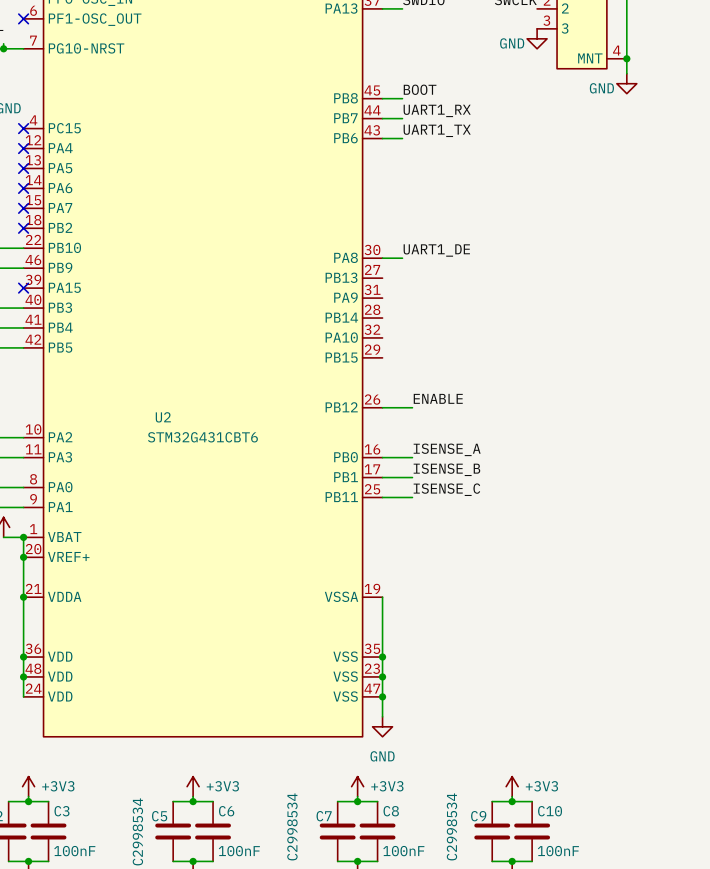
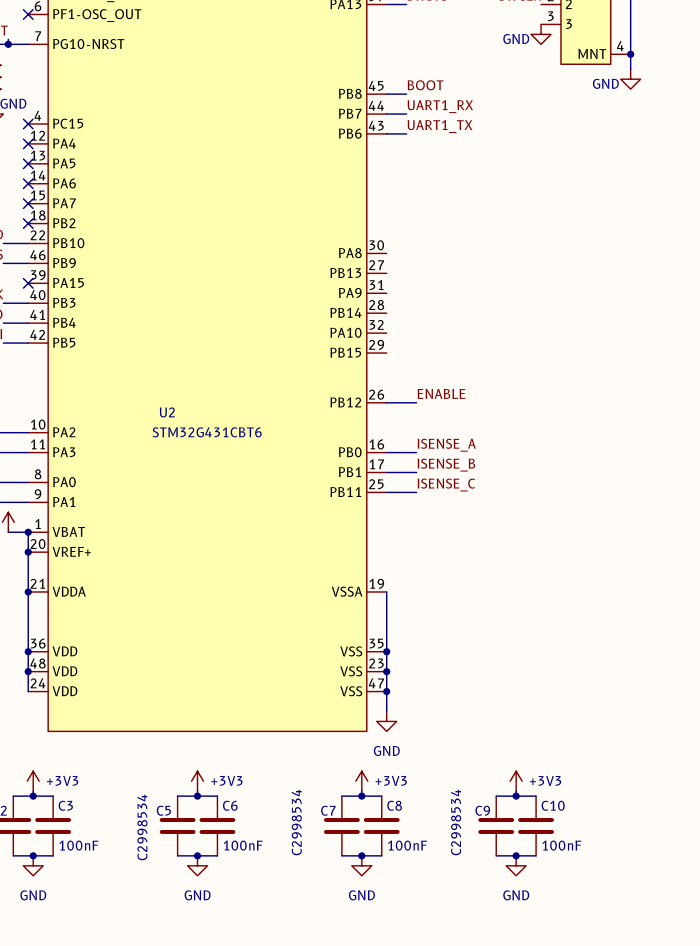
label: UART1_DE (436, 250) -> none
wire: (382, 258) (402, 258) -> none

